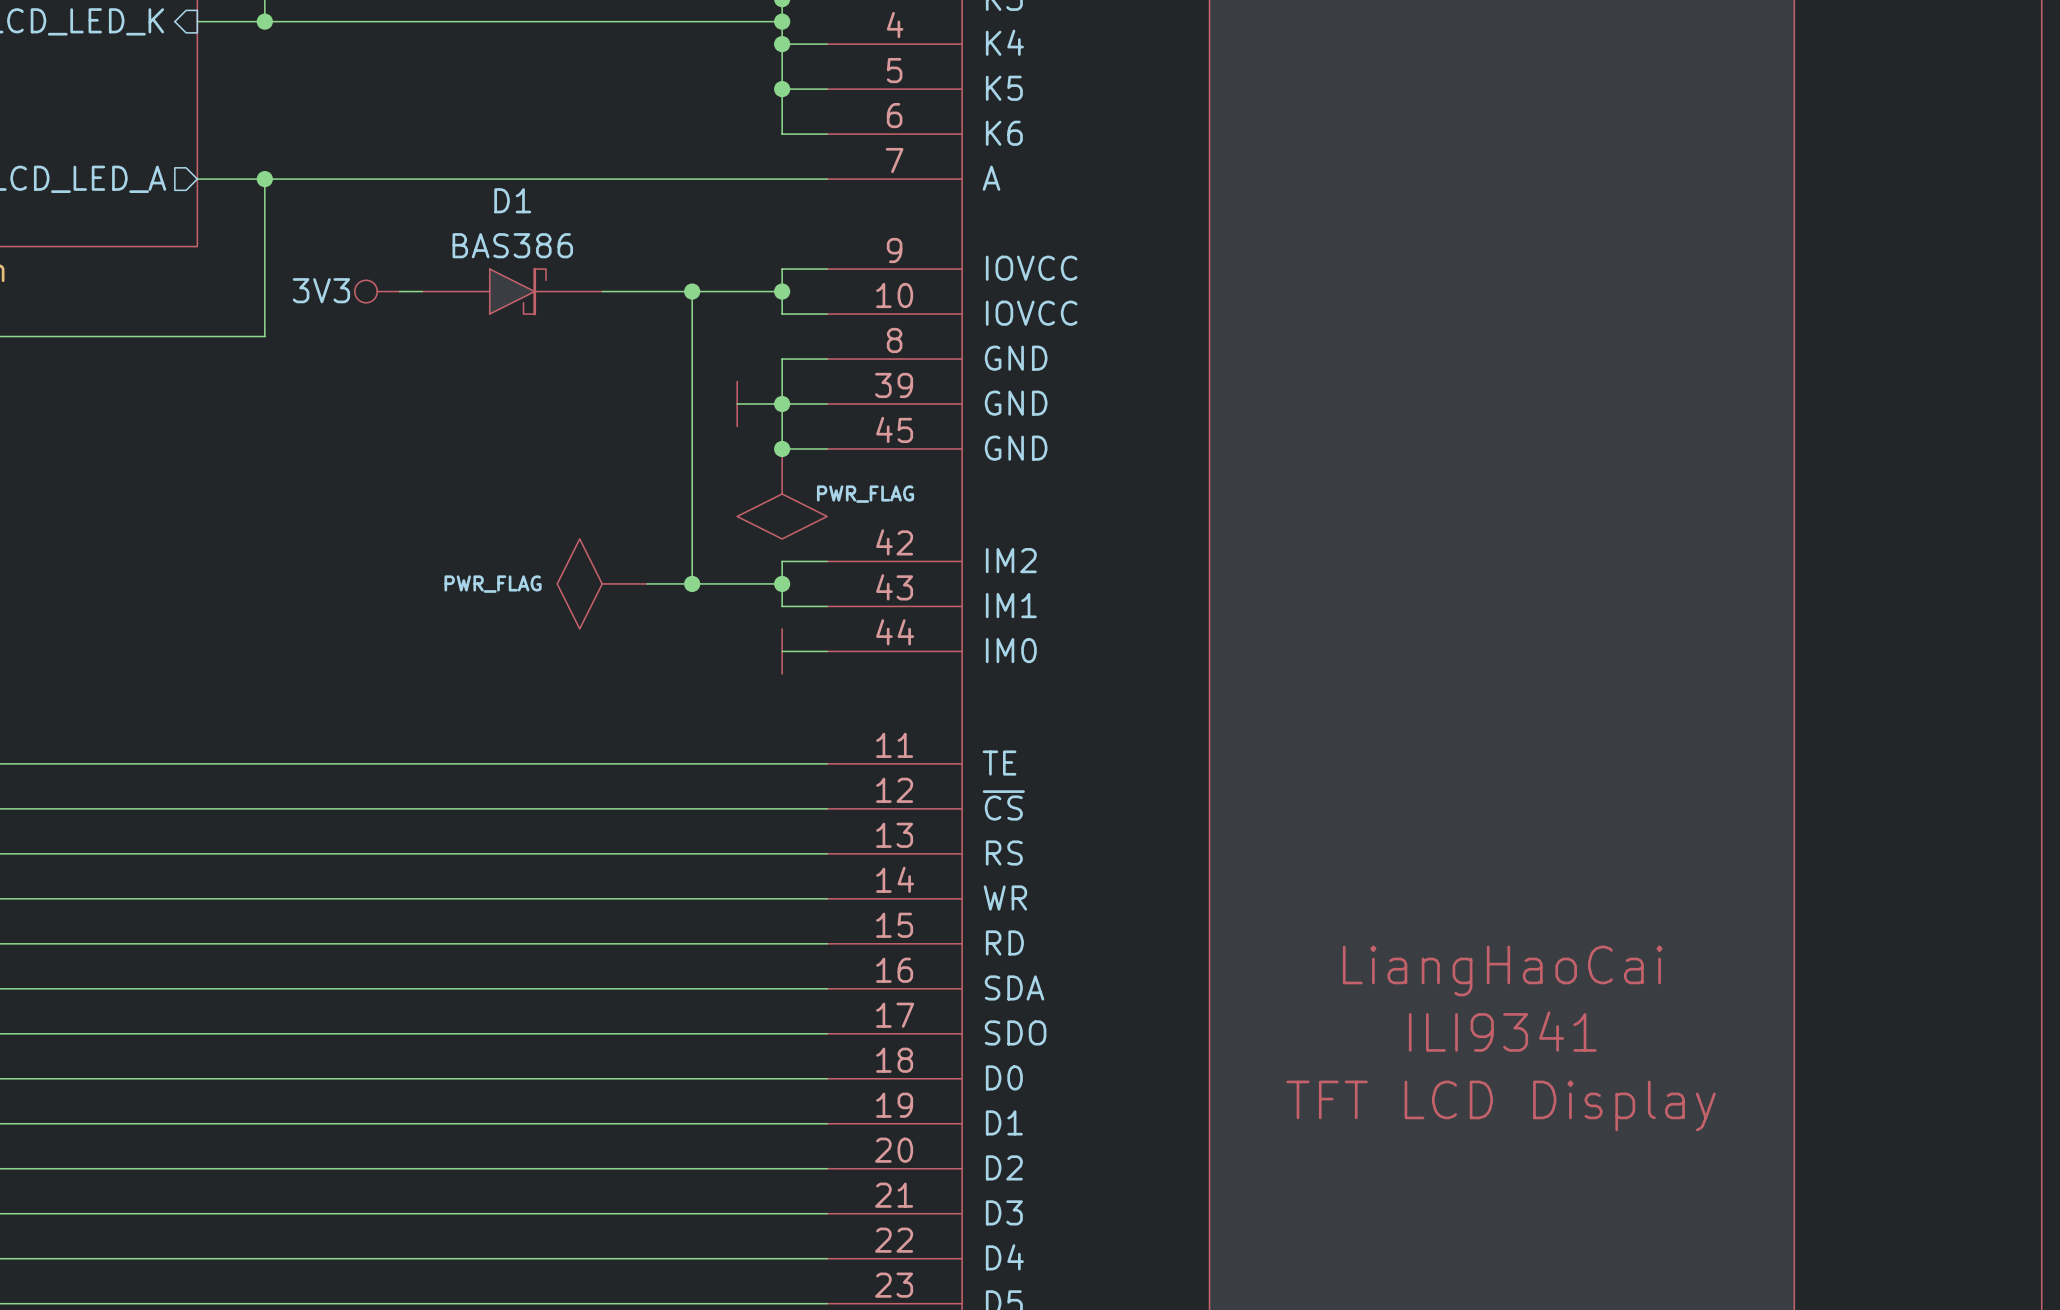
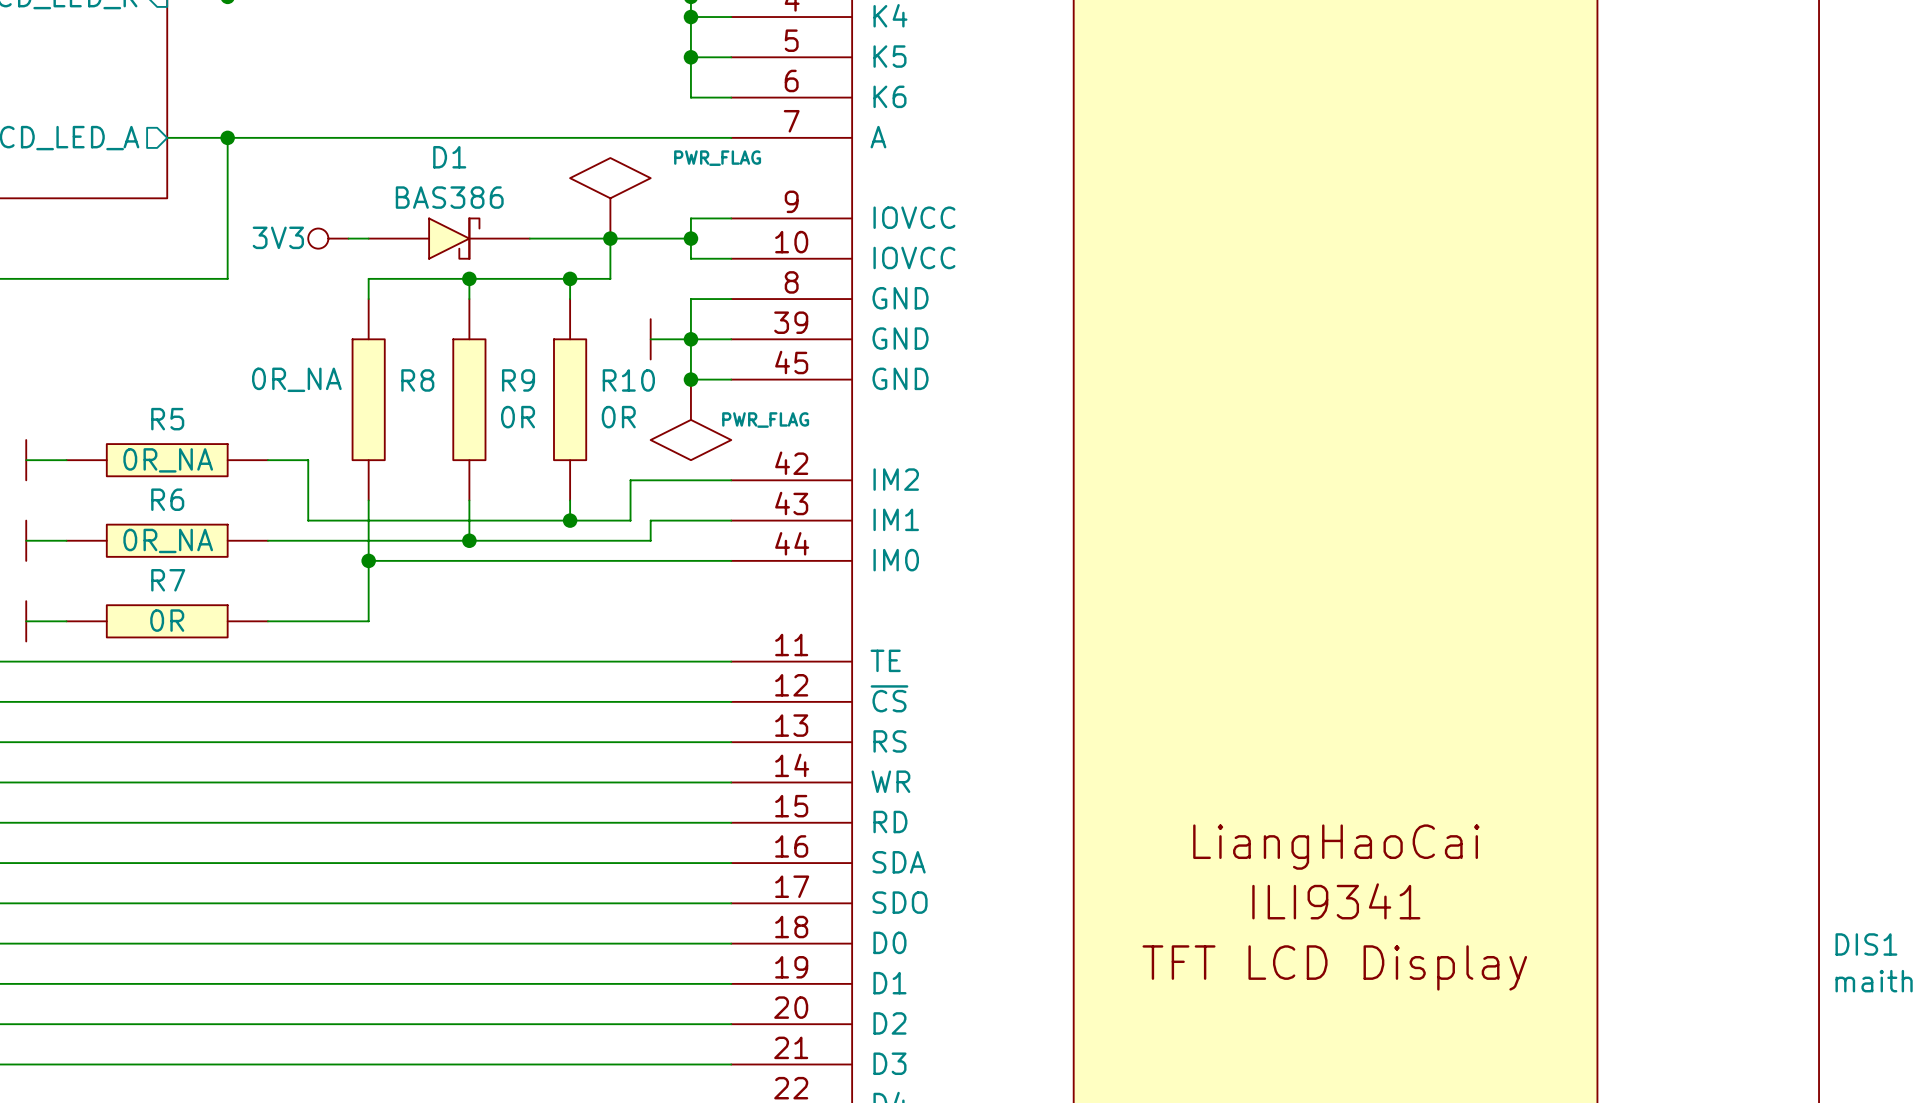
wire: none -> (469, 278) (469, 299)
junction: none -> (469, 278)
wire: none -> (570, 278) (570, 299)
junction: none -> (570, 278)
wire: (692, 336) (692, 583) -> (610, 278) (368, 278) (368, 299)
R8: none -> 0R_NA (368, 399)
R9: none -> 0R (469, 399)
R10: none -> 0R (570, 399)
wire: none -> (26, 460) (66, 460)
power symbol: none -> (26, 460)
R5: none -> 0R_NA (167, 460)
wire: (782, 561) (782, 606) -> (690, 480) (630, 480) (630, 520) (308, 520) (308, 460) (267, 460)
wire: none -> (368, 500) (368, 621) (267, 621)
wire: none -> (469, 500) (469, 540)
power symbol rotation: 0° (602, 583) -> 90° clockwise (610, 198)
power symbol position: PWR_FLAG (602, 583) -> PWR_FLAG (610, 198)
wire: (647, 583) (782, 583) -> (570, 500) (570, 520)
junction position: (692, 583) -> (570, 520)
junction: (782, 583) -> none
power symbol text position: PWR_FLAG (493, 584) -> PWR_FLAG (717, 158)
wire: none -> (690, 520) (650, 520) (650, 540) (267, 540)
wire: none -> (26, 540) (66, 540)
power symbol: none -> (26, 540)
R6: none -> 0R_NA (167, 540)
junction: none -> (469, 540)
wire: none -> (368, 560) (690, 560)
junction: none -> (368, 560)
power symbol: (782, 651) -> none
wire: none -> (26, 621) (66, 621)
power symbol: none -> (26, 621)
R7: none -> 0R (167, 621)

